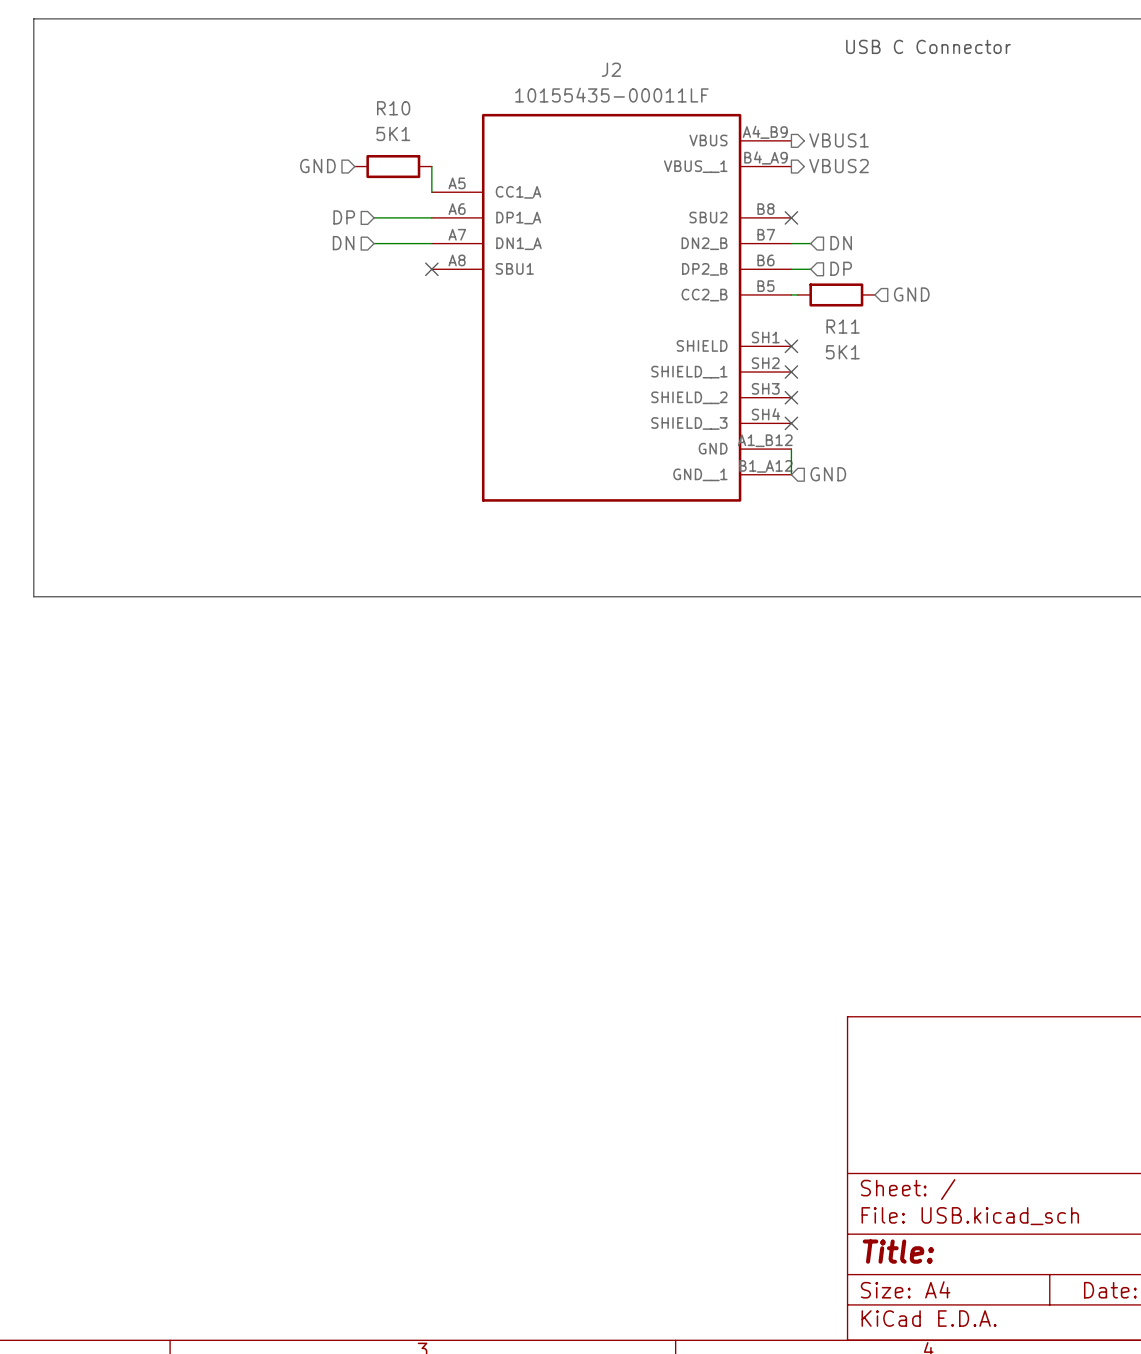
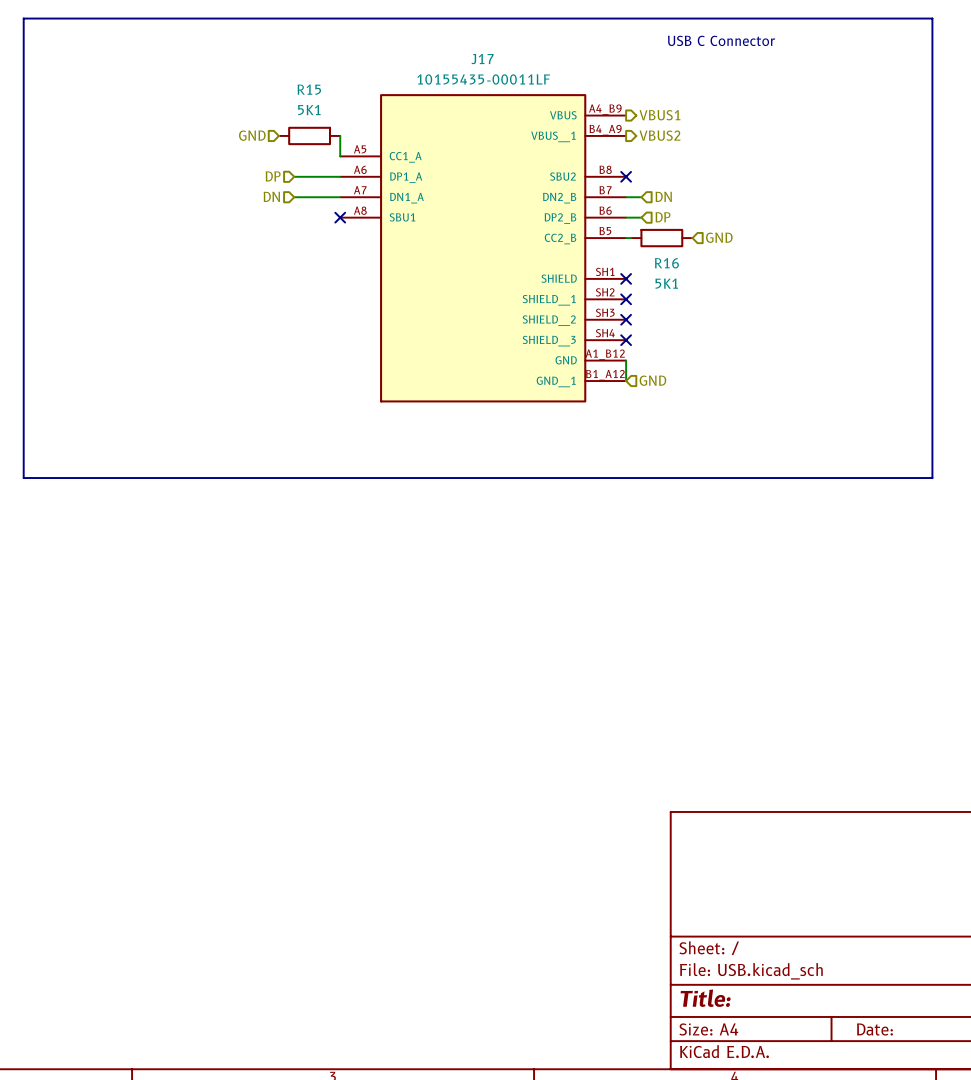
J2 name: J2 (611, 69) -> J17 (482, 59)
R10 name: R10 (393, 108) -> R15 (309, 89)
R11 name: R11 (843, 326) -> R16 (666, 263)

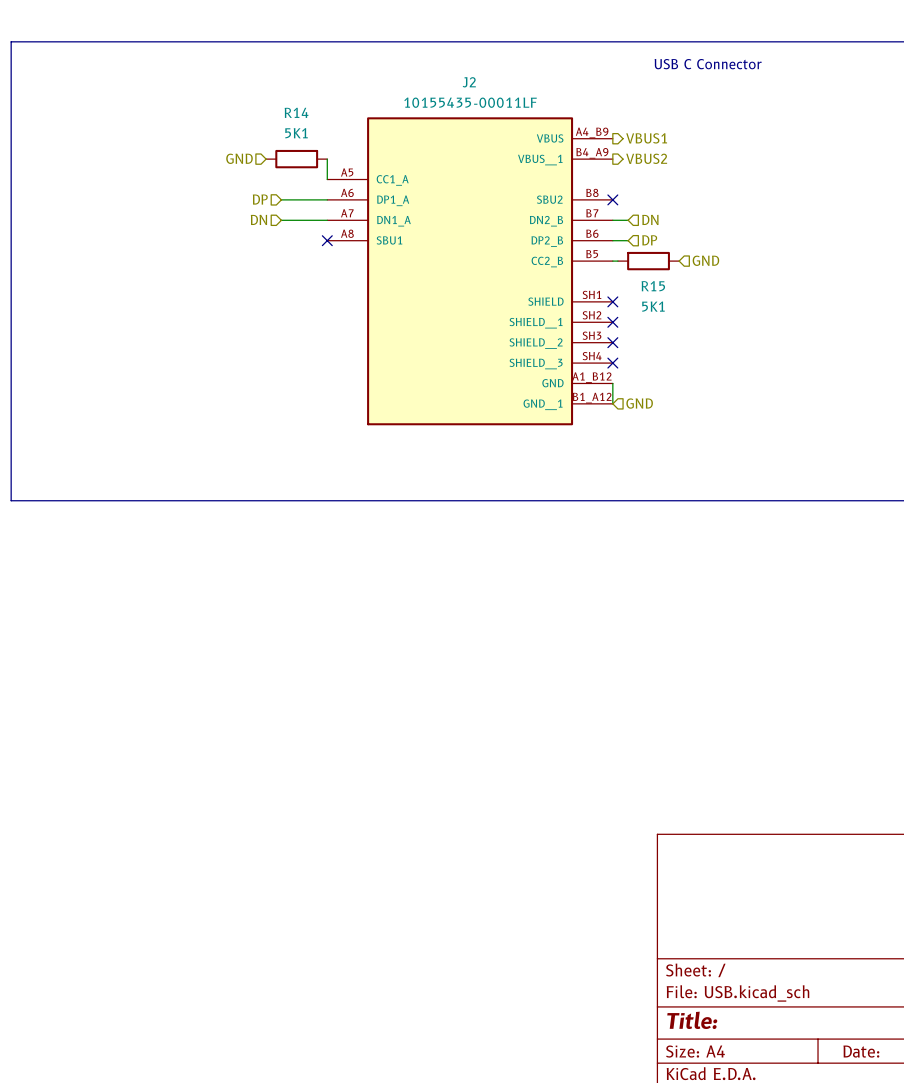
J17 name: J17 (482, 59) -> J2 (469, 82)
R15 name: R15 (309, 89) -> R14 (296, 112)
R16 name: R16 (666, 263) -> R15 (653, 286)

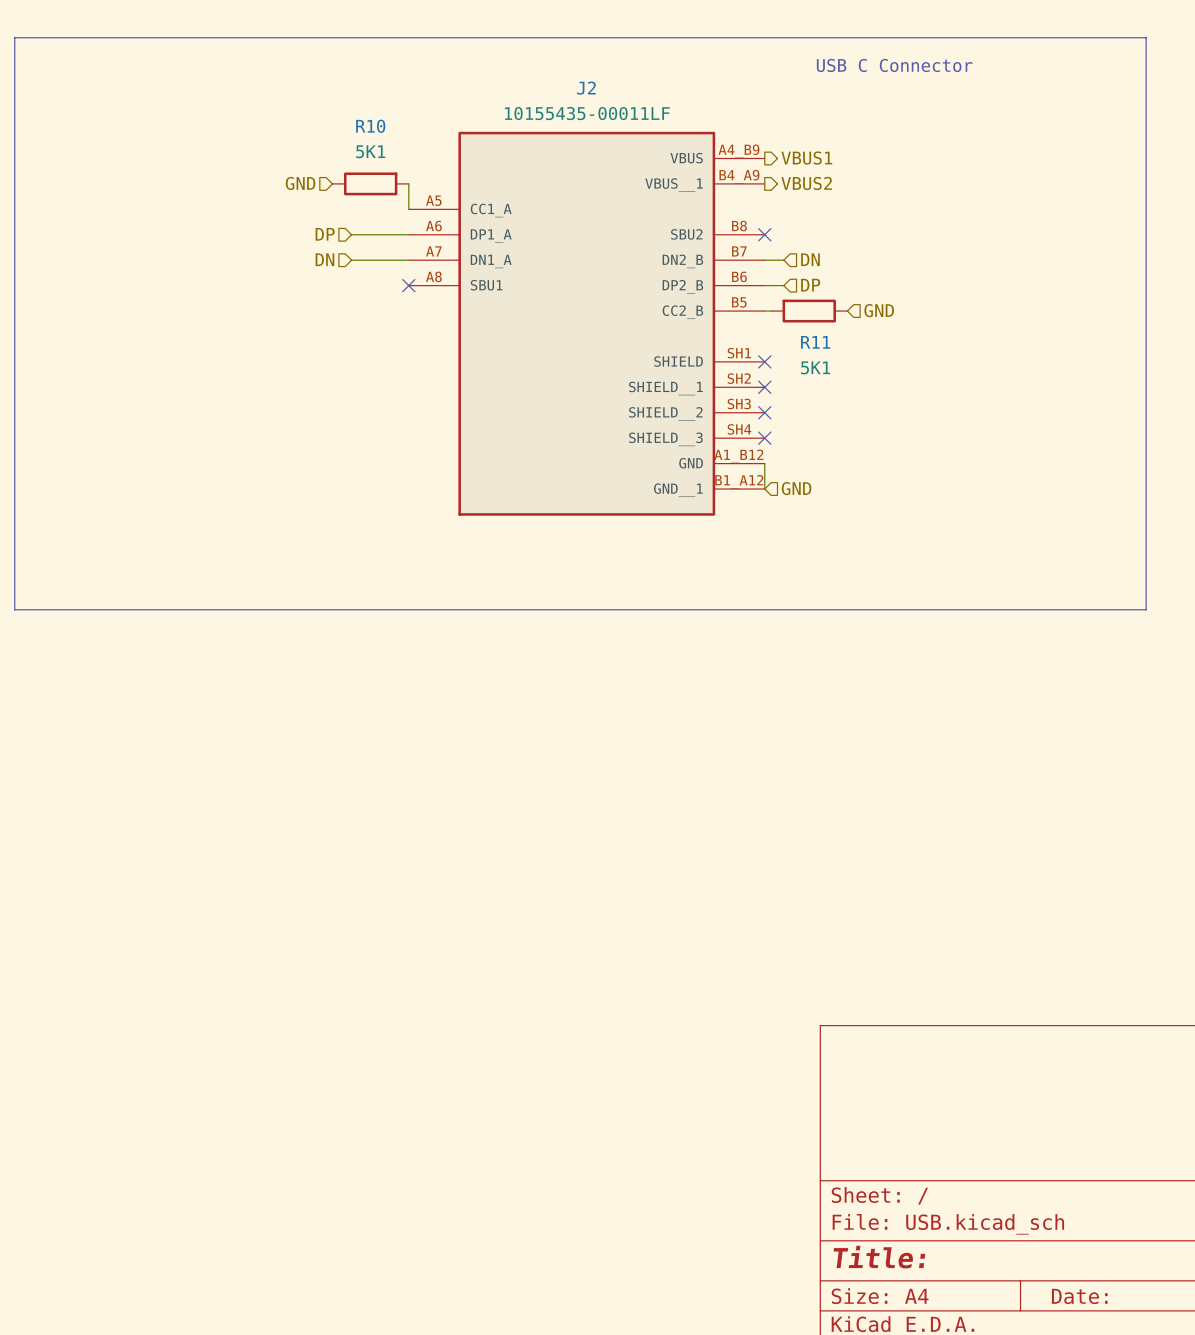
R14 name: R14 (296, 112) -> R10 (370, 126)
R15 name: R15 (653, 286) -> R11 (815, 342)

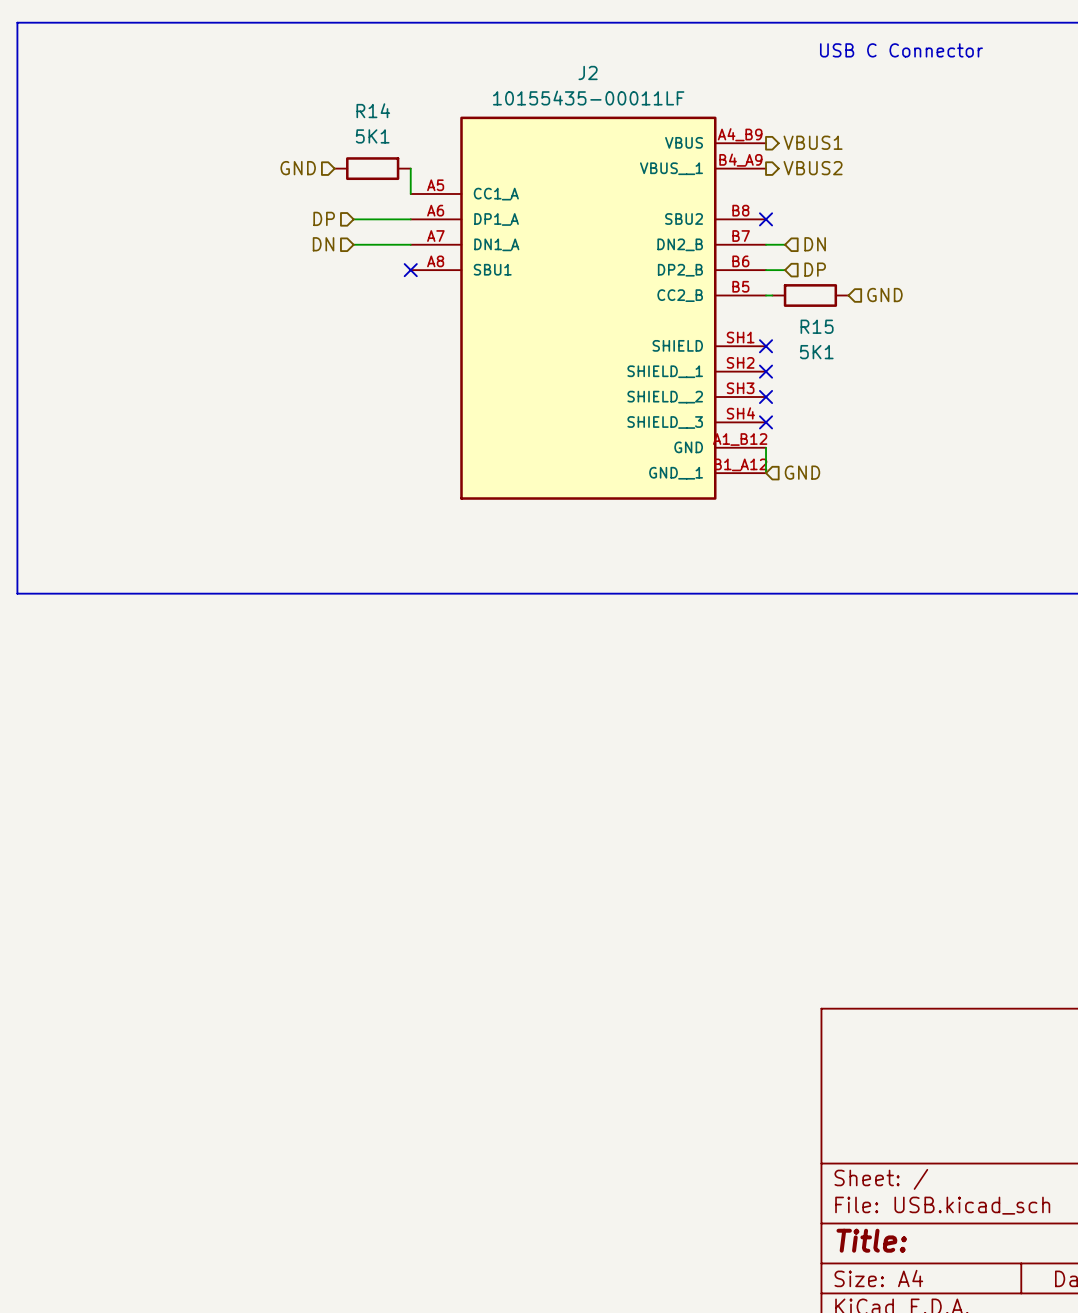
R10 name: R10 (370, 126) -> R14 (373, 110)
R11 name: R11 (815, 342) -> R15 (817, 326)

